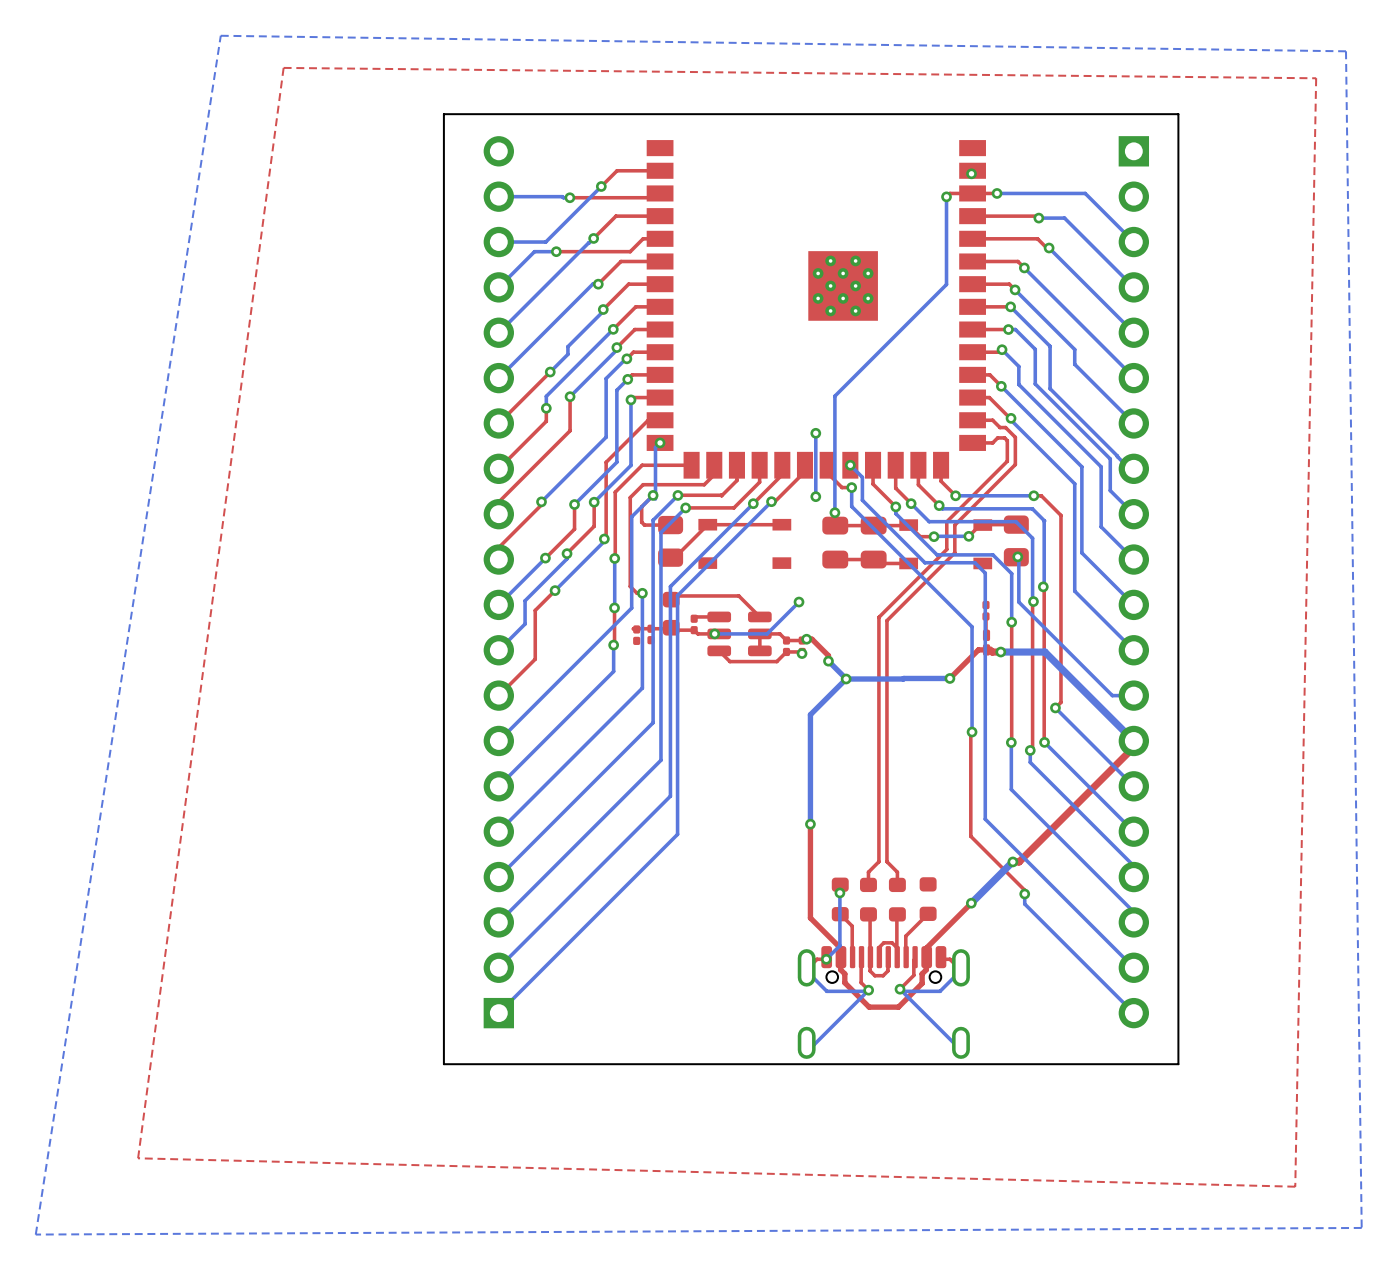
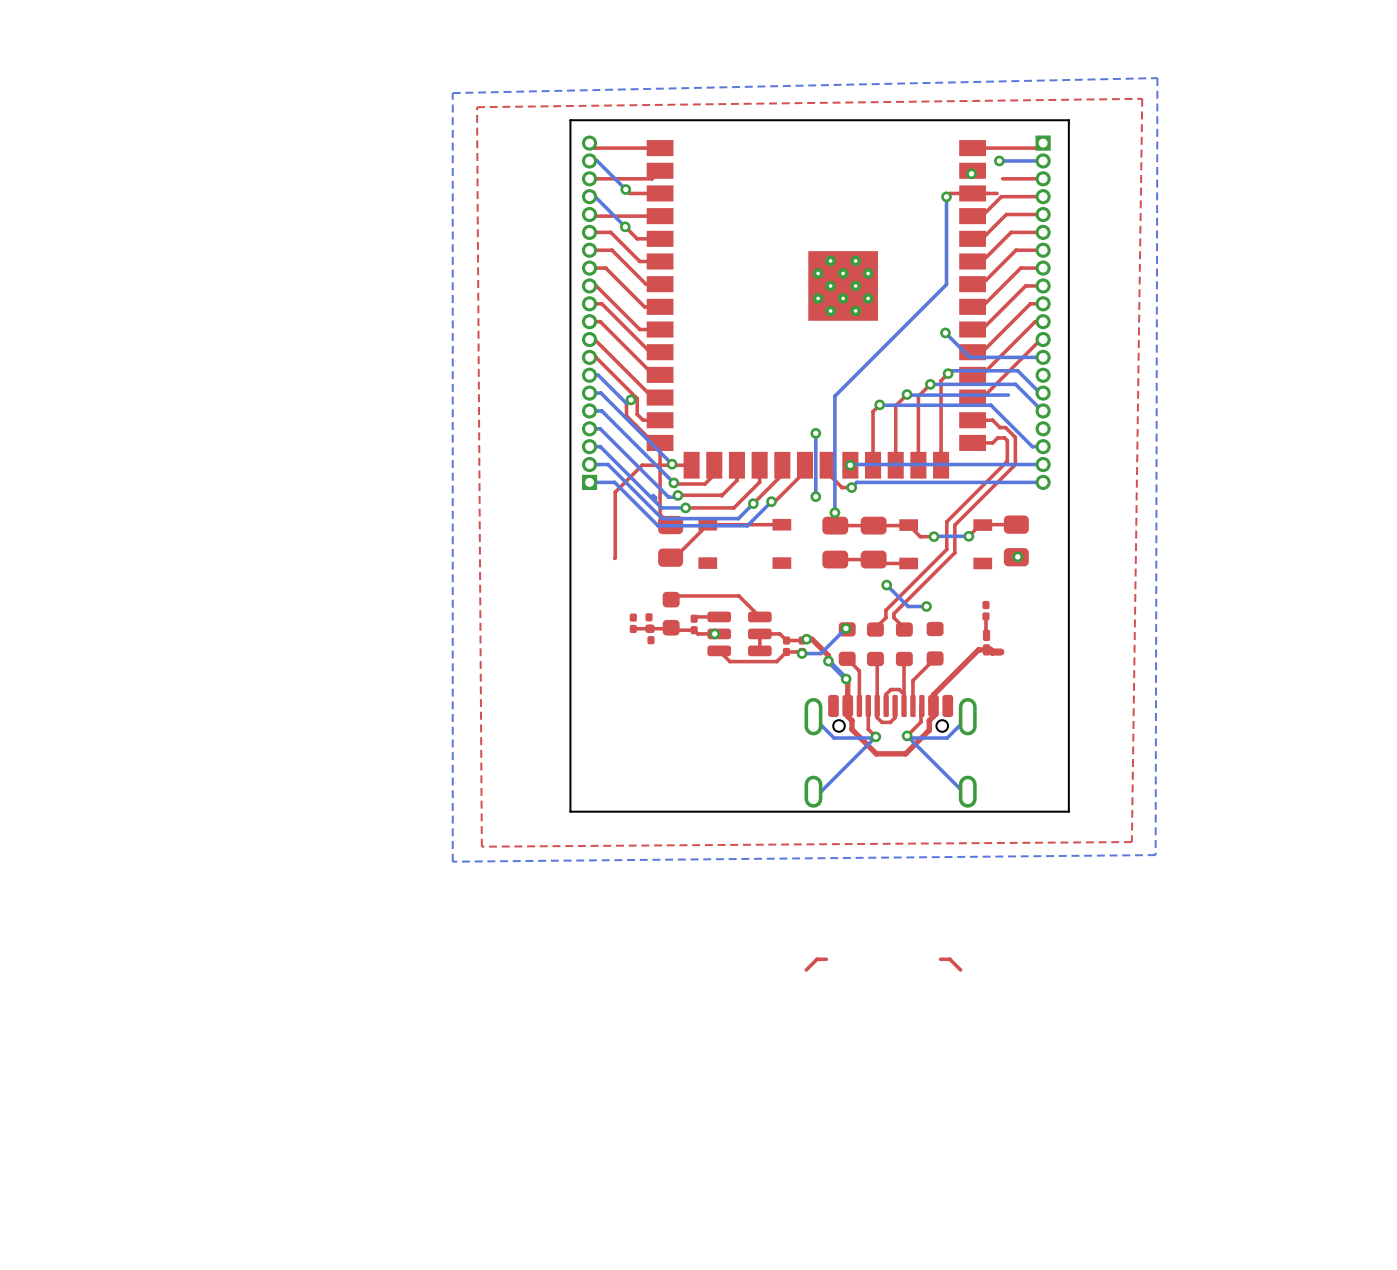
bottom zone outline: (220, 35) (1345, 51) (1361, 1227) (35, 1234) (220, 35) -> none
top zone outline: (283, 67) (1316, 78) (1295, 1186) (138, 1158) (283, 67) -> none
bottom zone outline: none -> (1157, 78) (452, 93) (452, 861) (1155, 855) (1157, 78)
top zone outline: none -> (1142, 98) (477, 107) (481, 846) (1131, 842) (1142, 98)
board edge: (1178, 114) (443, 114) (443, 1064) (1178, 1064) (1178, 114) -> none
board edge: none -> (1068, 120) (570, 120) (570, 811) (1068, 811) (1068, 120)
top track: none -> (589, 143) (594, 148) (660, 148)
top track: none -> (1043, 143) (1038, 148) (972, 148)
bottom track: none -> (589, 160) (597, 160) (625, 189)
bottom track: none -> (1043, 160) (999, 160)
top track: (660, 170) (617, 170) (601, 186) -> (660, 170) (652, 178) (589, 178)
top track: none -> (1043, 178) (1002, 178)
bottom track: (601, 186) (545, 242) (498, 242) -> none
via: (601, 186) -> none
via: none -> (625, 189)
top track: (660, 193) (655, 197) (569, 197) -> (660, 193) (629, 193) (625, 189)
bottom track: (997, 193) (1085, 193) (1133, 242) -> none
via position: (997, 193) -> (999, 160)
bottom track: (498, 196) (569, 197) -> none
bottom track: none -> (589, 196) (595, 196) (625, 226)
via: (569, 197) -> none
top track: (615, 216) (593, 238) -> (615, 216) (591, 216) (589, 214)
top track: (982, 216) (1036, 216) (1038, 218) -> (982, 216) (1001, 196) (1043, 196)
bottom track: (1038, 218) (1064, 218) (1133, 287) -> none
via: (1038, 218) -> none
via: none -> (625, 226)
bottom track: (593, 238) (498, 332) -> none
via: (593, 238) -> none
top track: (643, 238) (630, 251) (556, 251) -> (643, 238) (637, 238) (625, 226)
top track: (982, 238) (1037, 238) (1049, 248) -> (982, 238) (1006, 214) (1043, 214)
bottom track: (1049, 248) (1133, 332) -> none
via: (1049, 248) -> none
bottom track: (556, 251) (534, 251) (498, 287) -> none
via: (556, 251) -> none
top track: (639, 261) (620, 261) (598, 284) -> (639, 261) (610, 232) (589, 232)
top track: (982, 261) (1017, 261) (1024, 267) -> (982, 261) (1011, 232) (1043, 232)
bottom track: (1024, 267) (1133, 378) -> none
via: (1024, 267) -> none
bottom track: (598, 284) (592, 284) (498, 378) -> none
via: (598, 284) -> none
top track: (645, 284) (628, 284) (603, 309) -> (645, 284) (612, 250) (589, 250)
top track: (982, 284) (1009, 284) (1015, 289) -> (982, 284) (1015, 250) (1043, 250)
bottom track: (1015, 289) (1074, 349) (1074, 364) (1133, 423) -> none
via: (1015, 289) -> none
top track: (644, 306) (635, 306) (613, 329) -> (644, 306) (605, 268) (589, 268)
top track: (1010, 306) (982, 306) -> (1043, 268) (1020, 268) (982, 306)
bottom track: (1010, 306) (1050, 346) (1050, 388) (1129, 468) (1133, 468) -> none
via: (1010, 306) -> none
bottom track: (603, 309) (567, 346) (567, 354) (550, 372) -> none
via: (603, 309) -> none
part: none -> (589, 312)
part: none -> (1043, 312)
bottom track: (613, 329) (546, 396) (546, 408) -> none
via: (613, 329) -> none
top track: (639, 329) (634, 329) (616, 347) -> (639, 329) (596, 285) (589, 285)
top track: (1008, 329) (982, 329) -> (1043, 285) (1025, 285) (982, 329)
bottom track: (1008, 329) (1015, 329) (1035, 349) (1035, 383) (1110, 459) (1110, 490) (1133, 514) -> none
via: (1008, 329) -> none
bottom track: none -> (945, 332) (969, 357) (1043, 357)
via: none -> (945, 332)
bottom track: (616, 347) (616, 349) (570, 396) -> none
via: (616, 347) -> none
top track: (1002, 349) (999, 352) (982, 352) -> (1043, 303) (1030, 303) (982, 352)
bottom track: (1002, 349) (1018, 366) (1018, 384) (1101, 466) (1101, 526) (1133, 559) -> none
via: (1002, 349) -> none
top track: (650, 352) (633, 352) (626, 358) -> (650, 352) (601, 303) (589, 303)
bottom track: (626, 358) (606, 378) (606, 437) (541, 501) -> none
via: (626, 358) -> none
top track: (550, 372) (498, 423) -> none
via: (550, 372) -> none
top track: none -> (948, 373) (941, 380) (941, 465) (947, 458)
bottom track: none -> (948, 373) (950, 370) (1017, 370) (1040, 393) (1043, 393)
via: none -> (948, 373)
top track: (653, 374) (632, 374) (627, 379) -> (653, 374) (600, 321) (589, 321)
top track: (982, 374) (989, 374) (1001, 386) -> (982, 374) (1035, 321) (1043, 321)
bottom track: none -> (589, 375) (598, 375) (626, 403)
bottom track: (627, 379) (616, 390) (616, 462) (574, 504) -> none
via: (627, 379) -> none
bottom track: none -> (930, 384) (1015, 384) (1043, 410)
via: none -> (930, 384)
bottom track: (1001, 386) (1081, 466) (1081, 552) (1133, 604) -> none
via: (1001, 386) -> none
bottom track: none -> (589, 393) (600, 393) (672, 464)
via: none -> (907, 394)
bottom track: none -> (1008, 395) (907, 395)
top track: (570, 396) (570, 430) (498, 502) (498, 514) -> none
via: (570, 396) -> none
top track: (652, 397) (633, 397) (630, 399) -> (652, 397) (594, 339) (589, 339)
top track: (982, 397) (989, 397) (1011, 418) -> (982, 397) (1040, 339) (1043, 339)
bottom track: (630, 399) (630, 465) (594, 502) -> none
bottom track: none -> (879, 404) (990, 405) (1032, 446) (1043, 446)
via: none -> (879, 404)
top track: (546, 408) (546, 421) (498, 468) -> none
via: (546, 408) -> none
bottom track: none -> (589, 410) (601, 410) (673, 482)
bottom track: (1011, 418) (1074, 483) (1074, 591) (1133, 650) -> none
via: (1011, 418) -> none
top track: (648, 420) (606, 462) (606, 537) (604, 539) -> (648, 420) (643, 420) (637, 414) (637, 398) (595, 357) (589, 357)
bottom track: none -> (589, 428) (600, 428) (668, 497) (674, 497)
bottom track: (660, 442) (655, 447) (655, 493) (631, 516) (631, 608) (498, 740) -> none
via: (660, 442) -> none
via: none -> (672, 464)
bottom track: none -> (1043, 464) (851, 464)
bottom track: (850, 465) (862, 477) (862, 500) (924, 562) (974, 562) (985, 573) (985, 819) (1133, 967) -> none
top track: (873, 465) (873, 484) (895, 506) -> (873, 465) (873, 411) (879, 404)
top track: (895, 465) (895, 488) (911, 503) -> (895, 465) (895, 405) (907, 394)
top track: (918, 465) (918, 484) (939, 505) -> (918, 465) (918, 396) (930, 384)
top track: (941, 465) (941, 481) (955, 495) -> none
via: none -> (673, 482)
top track: (704, 484) (643, 484) (630, 497) (630, 586) (637, 593) (642, 593) -> (704, 484) (673, 482)
bottom track: (851, 487) (851, 506) (972, 626) (972, 732) -> (851, 487) (856, 482) (1043, 482)
top track: (653, 495) (641, 506) (641, 522) (644, 525) (670, 525) -> (626, 403) (626, 415) (653, 442) (660, 442) (660, 514) (670, 525)
via: (653, 495) -> none
bottom track: (677, 495) (653, 520) (653, 722) (498, 877) -> none
via: (955, 495) -> none
top track: (1033, 495) (1041, 495) (1060, 515) (1060, 702) (1055, 707) -> none
bottom track: (1033, 495) (955, 495) -> none
via: (1033, 495) -> none
top track: (541, 501) (541, 504) (498, 547) (498, 559) -> none
via: (541, 501) -> none
top track: (594, 502) (594, 526) (567, 553) -> none
via: (594, 502) -> none
bottom track: (911, 503) (929, 521) (1015, 521) (1032, 538) (1033, 601) -> none
via: (911, 503) -> none
top track: (574, 504) (574, 529) (545, 558) -> none
via: (574, 504) -> none
bottom track: (939, 505) (942, 508) (1032, 508) (1044, 520) (1043, 586) -> none
via: (939, 505) -> none
bottom track: (895, 506) (895, 513) (937, 554) (992, 554) (1011, 573) (1011, 622) -> none
via: (895, 506) -> none
bottom track: (685, 507) (660, 532) (660, 760) (498, 922) -> (685, 507) (661, 507) (600, 446) (589, 446)
bottom track: (738, 518) (670, 586) (670, 796) (498, 967) -> (738, 518) (662, 518) (608, 464) (589, 464)
bottom track: (747, 525) (677, 595) (677, 834) (498, 1013) -> (747, 525) (658, 525) (614, 482) (589, 482)
bottom track: (604, 539) (604, 541) (555, 590) -> none
via: (604, 539) -> none
bottom track: (567, 553) (567, 558) (525, 600) (525, 624) (498, 650) -> none
via: (567, 553) -> none
bottom track: (1017, 556) (1018, 602) (1112, 695) (1133, 695) -> none
bottom track: (545, 558) (498, 604) -> none
via: (545, 558) -> none
bottom track: (614, 558) (614, 607) -> none
via: (614, 558) -> none
part: (498, 582) -> none
part: (1133, 582) -> none
bottom track: none -> (886, 585) (908, 606) (926, 606)
via: none -> (886, 585)
top track: (1043, 586) (1044, 742) -> none
via: (1043, 586) -> none
top track: (555, 590) (535, 610) (535, 659) (498, 695) -> none
via: (555, 590) -> none
bottom track: (642, 593) (642, 688) (498, 831) -> none
via: (642, 593) -> none
top track: (1033, 601) (1032, 748) (1030, 750) -> none
via: (1033, 601) -> none
bottom track: (799, 602) (767, 633) (714, 633) -> none
via: (799, 602) -> none
via: none -> (926, 606)
top track: (614, 607) (613, 645) -> none
via: (614, 607) -> none
top track: (885, 610) (878, 617) (878, 861) (868, 872) (868, 884) -> (885, 610) (885, 617) (875, 629)
top track: (893, 613) (886, 620) (886, 861) (897, 872) (897, 884) -> (893, 613) (893, 617) (904, 629)
top track: (1011, 622) (1011, 742) -> none
via: (1011, 622) -> none
part: none -> (633, 623)
part: none -> (649, 623)
bottom track: none -> (845, 628) (820, 653) (802, 653)
via: none -> (845, 628)
part: (636, 635) -> none
part: none -> (935, 643)
part: none -> (847, 644)
part: none -> (875, 644)
part: none -> (904, 644)
bottom track: (613, 645) (613, 671) (498, 786) -> none
via: (613, 645) -> none
bottom track: (1000, 652) (1044, 652) (1133, 740) -> none
via: (1000, 652) -> none
top track: none -> (847, 658) (859, 670) (859, 705)
top track: none -> (935, 658) (912, 680) (912, 705)
top track: none -> (875, 659) (877, 660) (877, 717) (882, 722) (890, 722) (895, 717) (895, 705)
top track: none -> (904, 659) (904, 705)
top track: none -> (949, 678) (933, 694) (933, 716) (929, 720) (929, 730) (905, 753) (876, 753) (851, 729) (851, 720) (847, 716) (847, 680)
bottom track: (949, 678) (846, 679) (810, 714) (810, 824) -> none
via: (949, 678) -> none
bottom track: (1055, 707) (1133, 786) -> none
via: (1055, 707) -> none
top track: (972, 732) (970, 836) (1024, 890) (1024, 894) -> none
via: (972, 732) -> none
via: none -> (907, 735)
via: none -> (875, 736)
top track: (1133, 740) (1133, 747) (1019, 861) (1012, 861) -> none
bottom track: (1011, 742) (1011, 789) (1133, 912) (1133, 922) -> none
via: (1011, 742) -> none
bottom track: (1044, 742) (1133, 831) -> none
via: (1044, 742) -> none
bottom track: (1030, 750) (1030, 762) (1133, 865) (1133, 877) -> none
via: (1030, 750) -> none
top track: (810, 824) (810, 918) (840, 948) (840, 969) (844, 973) (844, 982) (869, 1007) (898, 1007) (922, 983) (922, 973) (926, 969) (926, 948) (971, 903) -> none
via: (810, 824) -> none
bottom track: (1012, 861) (971, 903) -> none
via: (1012, 861) -> none
bottom track: (839, 892) (839, 945) (826, 959) -> none
via: (839, 892) -> none
bottom track: (1024, 894) (1024, 904) (1133, 1013) -> none
via: (1024, 894) -> none
part: (840, 899) -> none
part: (868, 899) -> none
part: (897, 899) -> none
part: (928, 899) -> none
via: (971, 903) -> none
top track: (896, 912) (896, 959) -> none
top track: (928, 913) (905, 936) (905, 959) -> none
top track: (840, 914) (852, 926) (852, 959) -> none
top track: (870, 914) (870, 970) (874, 975) (883, 975) (887, 970) (887, 959) -> none
top track: (896, 947) (892, 942) (883, 942) (879, 947) (879, 959) -> (904, 694) (899, 689) (890, 689) (886, 694) (886, 705)
via: (826, 959) -> none
top track: (861, 959) (861, 982) (868, 990) -> (868, 705) (868, 729) (875, 736)
top track: (914, 959) (913, 975) (900, 989) -> (921, 705) (920, 722) (907, 735)
bottom track: (806, 969) (826, 991) (867, 991) -> (813, 716) (834, 738) (874, 738)
bottom track: (960, 969) (940, 991) (902, 991) -> (967, 716) (947, 738) (909, 738)
bottom track: (900, 989) (955, 1045) (960, 1045) -> (907, 735) (962, 791) (967, 791)
via: (900, 989) -> none
bottom track: (868, 990) (813, 1045) (806, 1045) -> (875, 736) (820, 791) (813, 791)
via: (868, 990) -> none
part position: (883, 1002) -> (890, 751)

